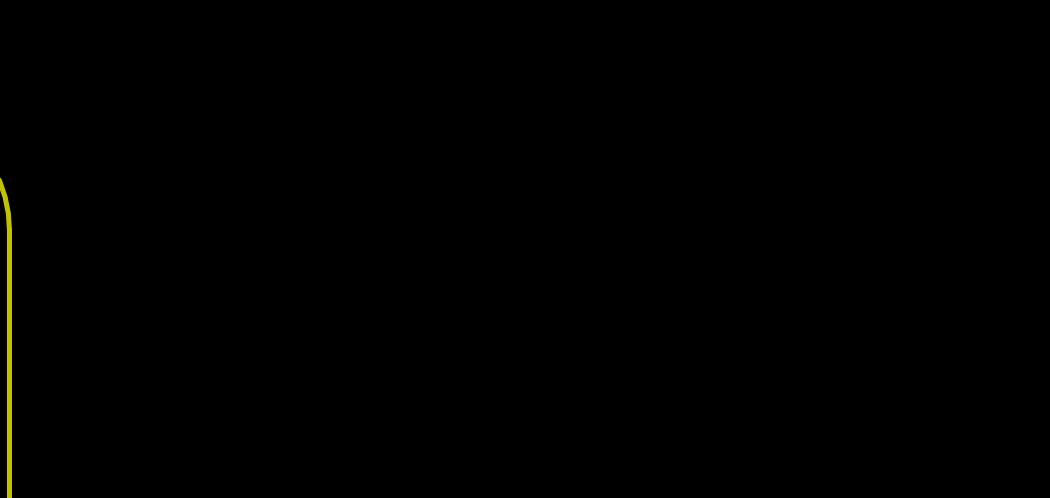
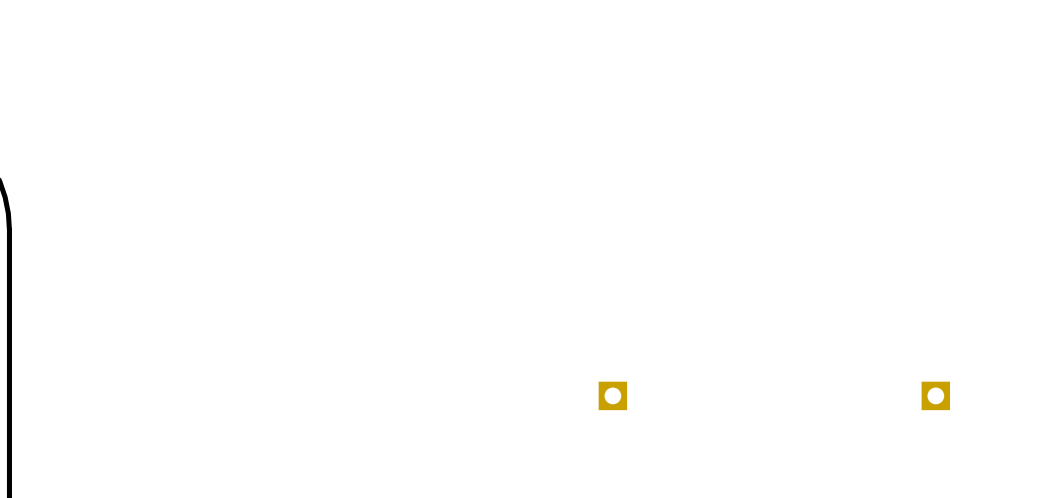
part: none -> (612, 395)
part: none -> (935, 395)

